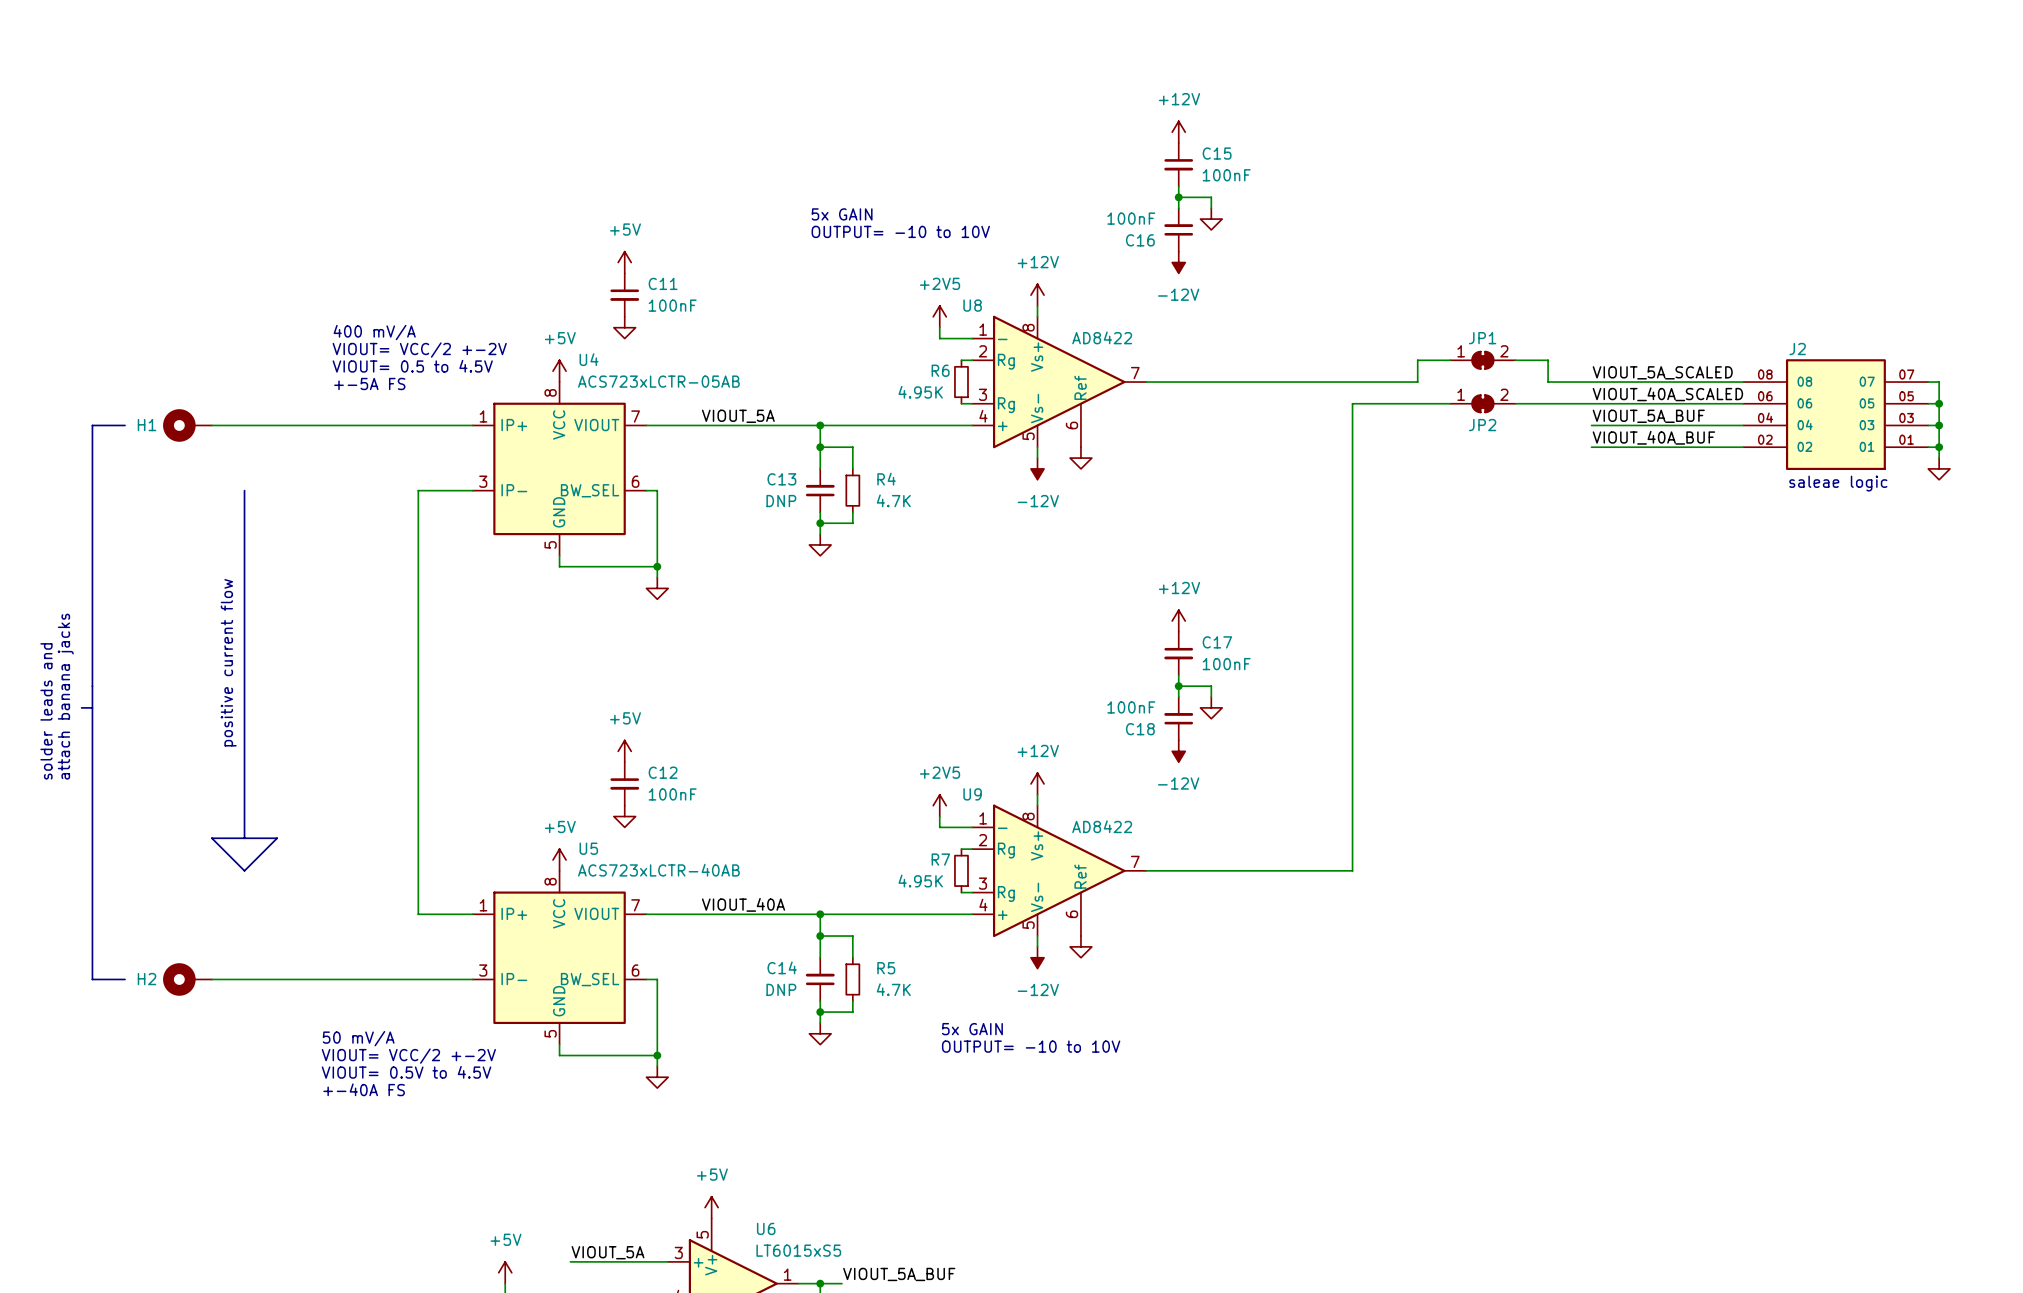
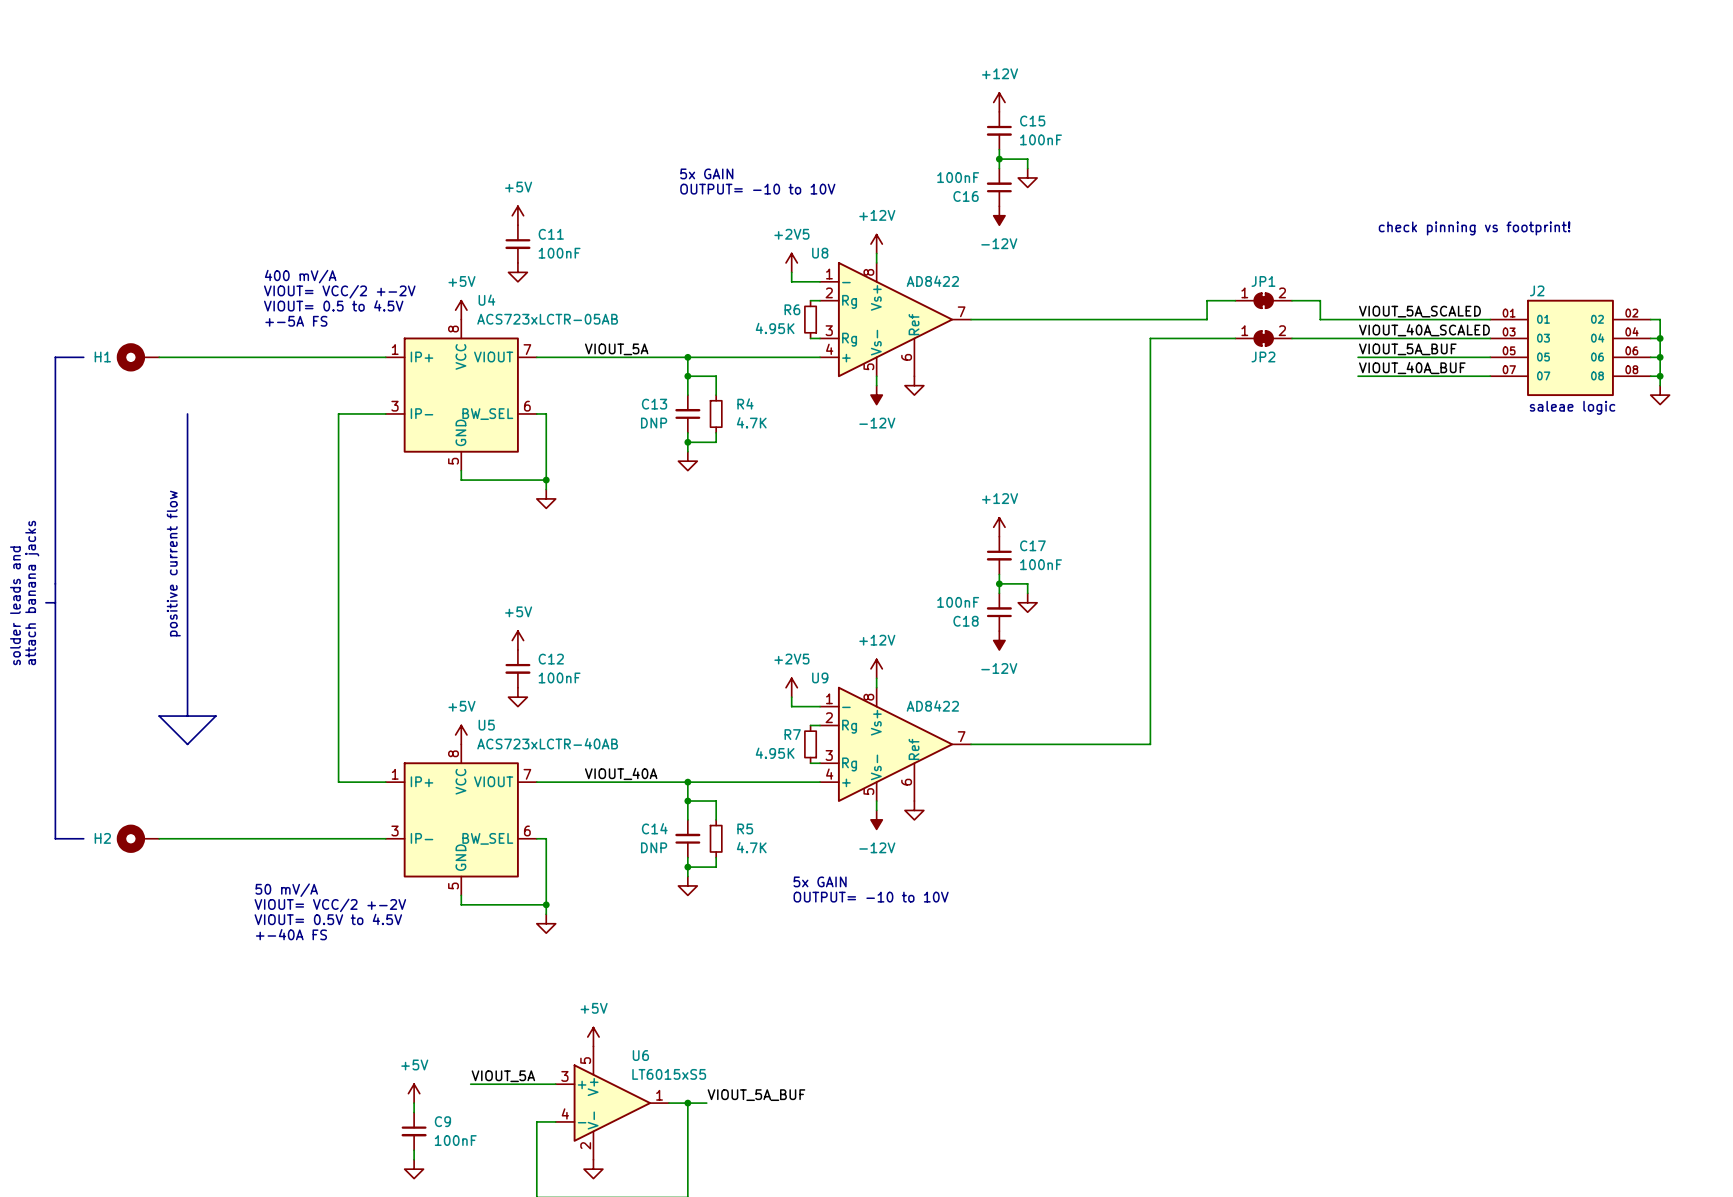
text: none -> check pinning vs footprint! (1474, 228)
J2 rotation: 0° (1835, 414) -> 180° (1570, 347)

